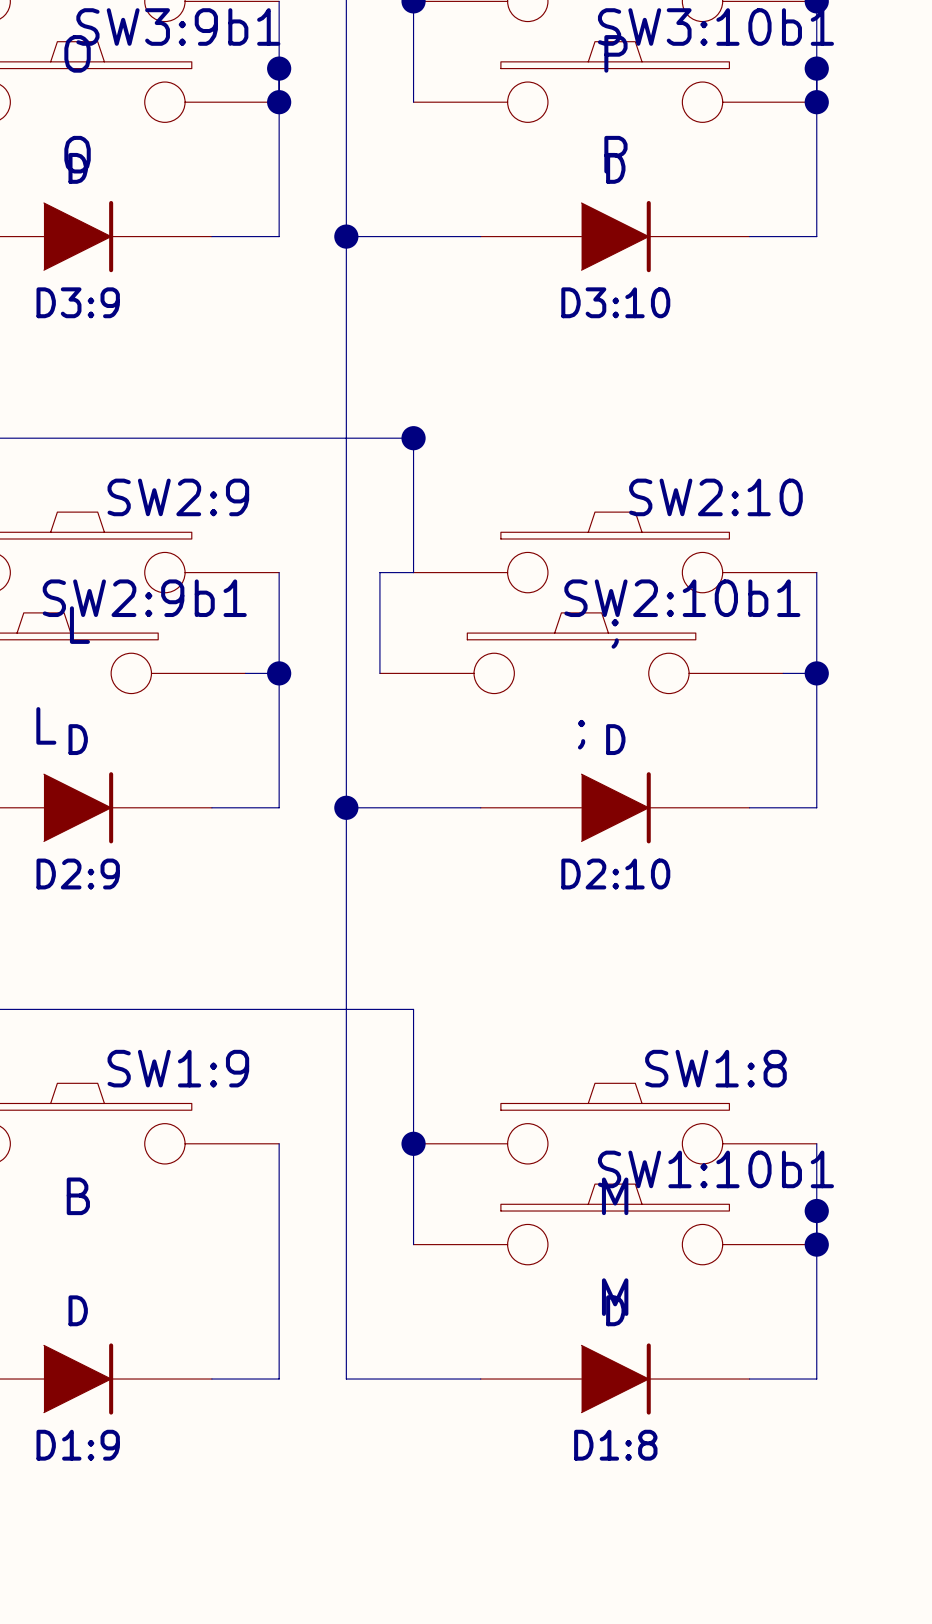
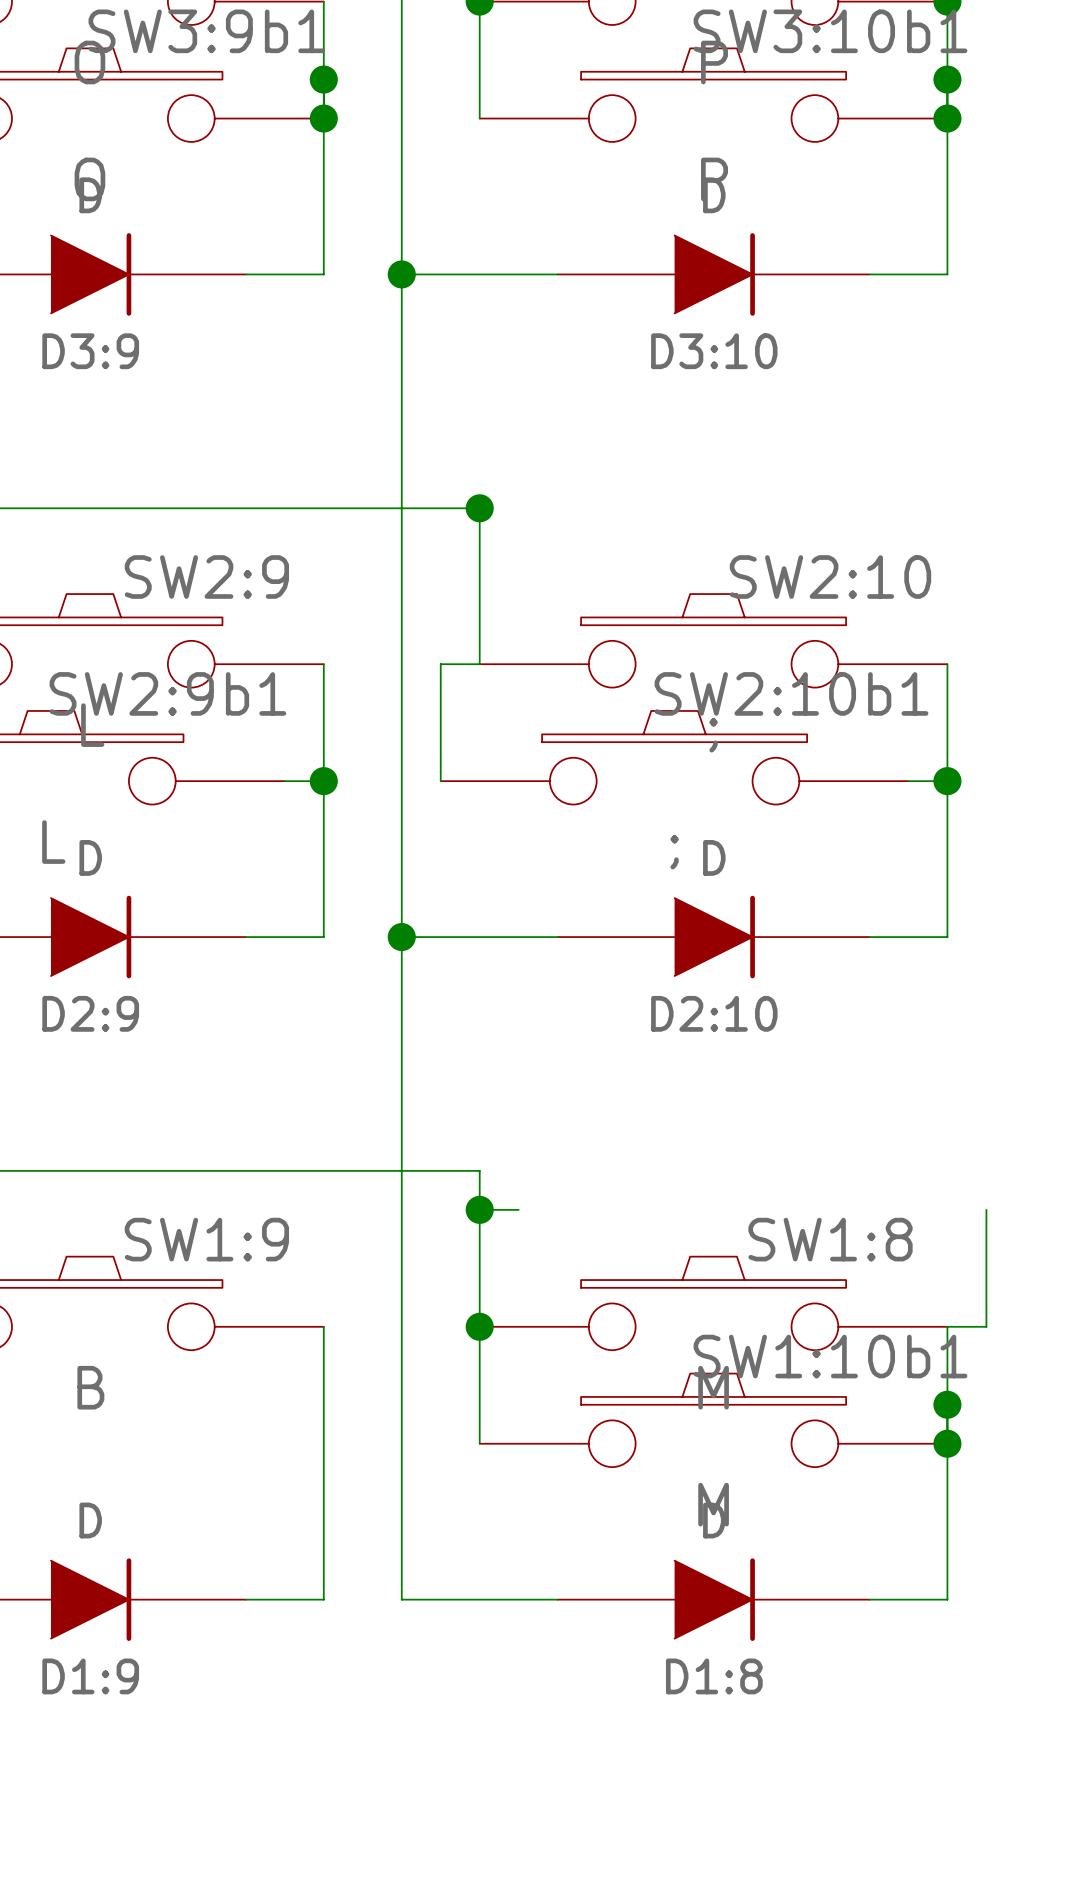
wire: none -> (479, 1209) (518, 1209)
junction: none -> (479, 1209)
wire: none -> (986, 1209) (986, 1326) (947, 1326)

